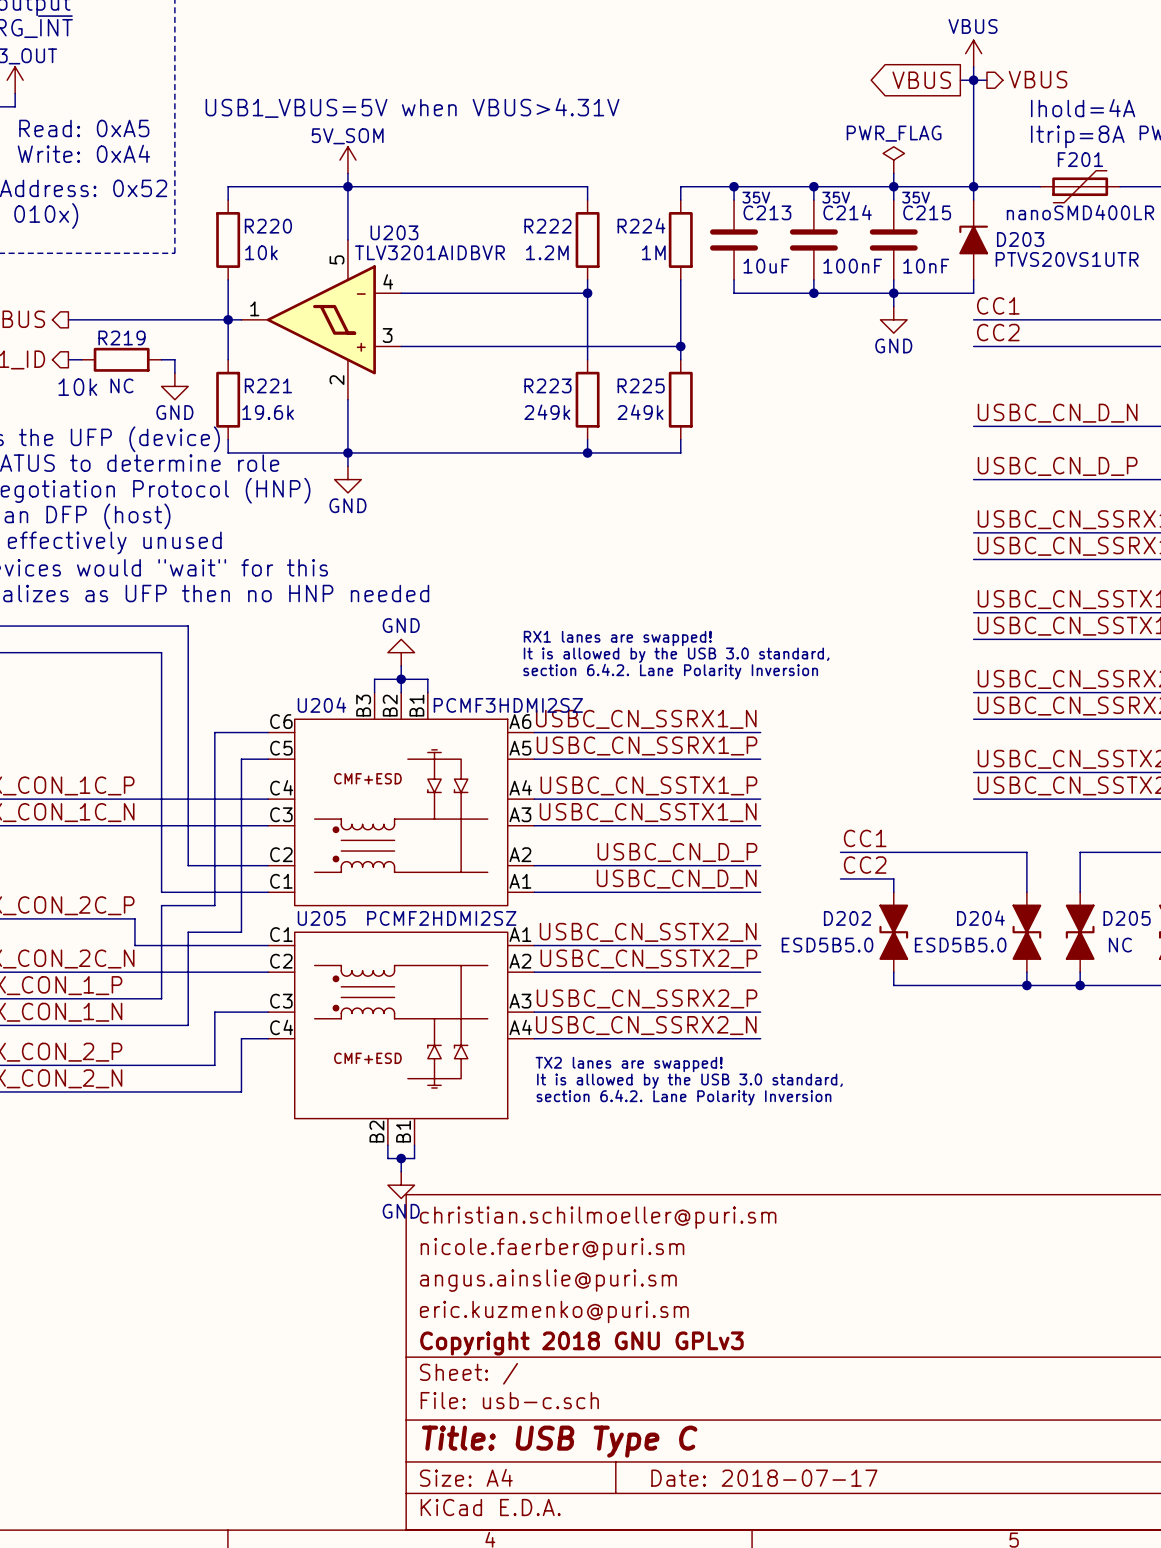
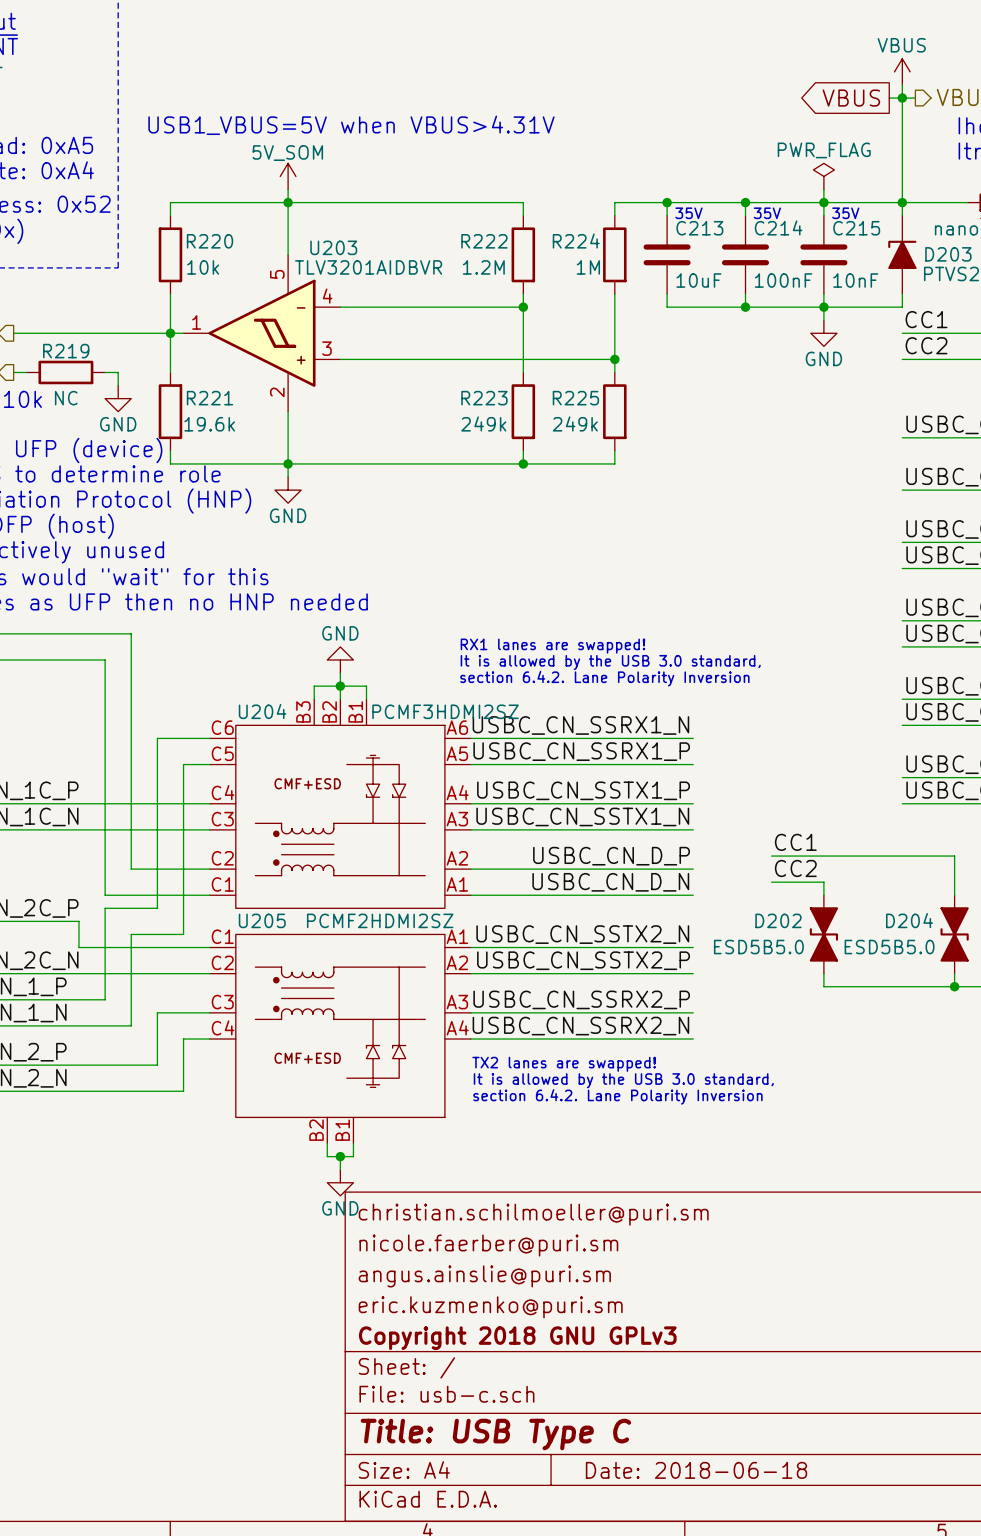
title block: Date: 2018-07-17 (764, 1478) -> Date: 2018-06-18 (696, 1470)

